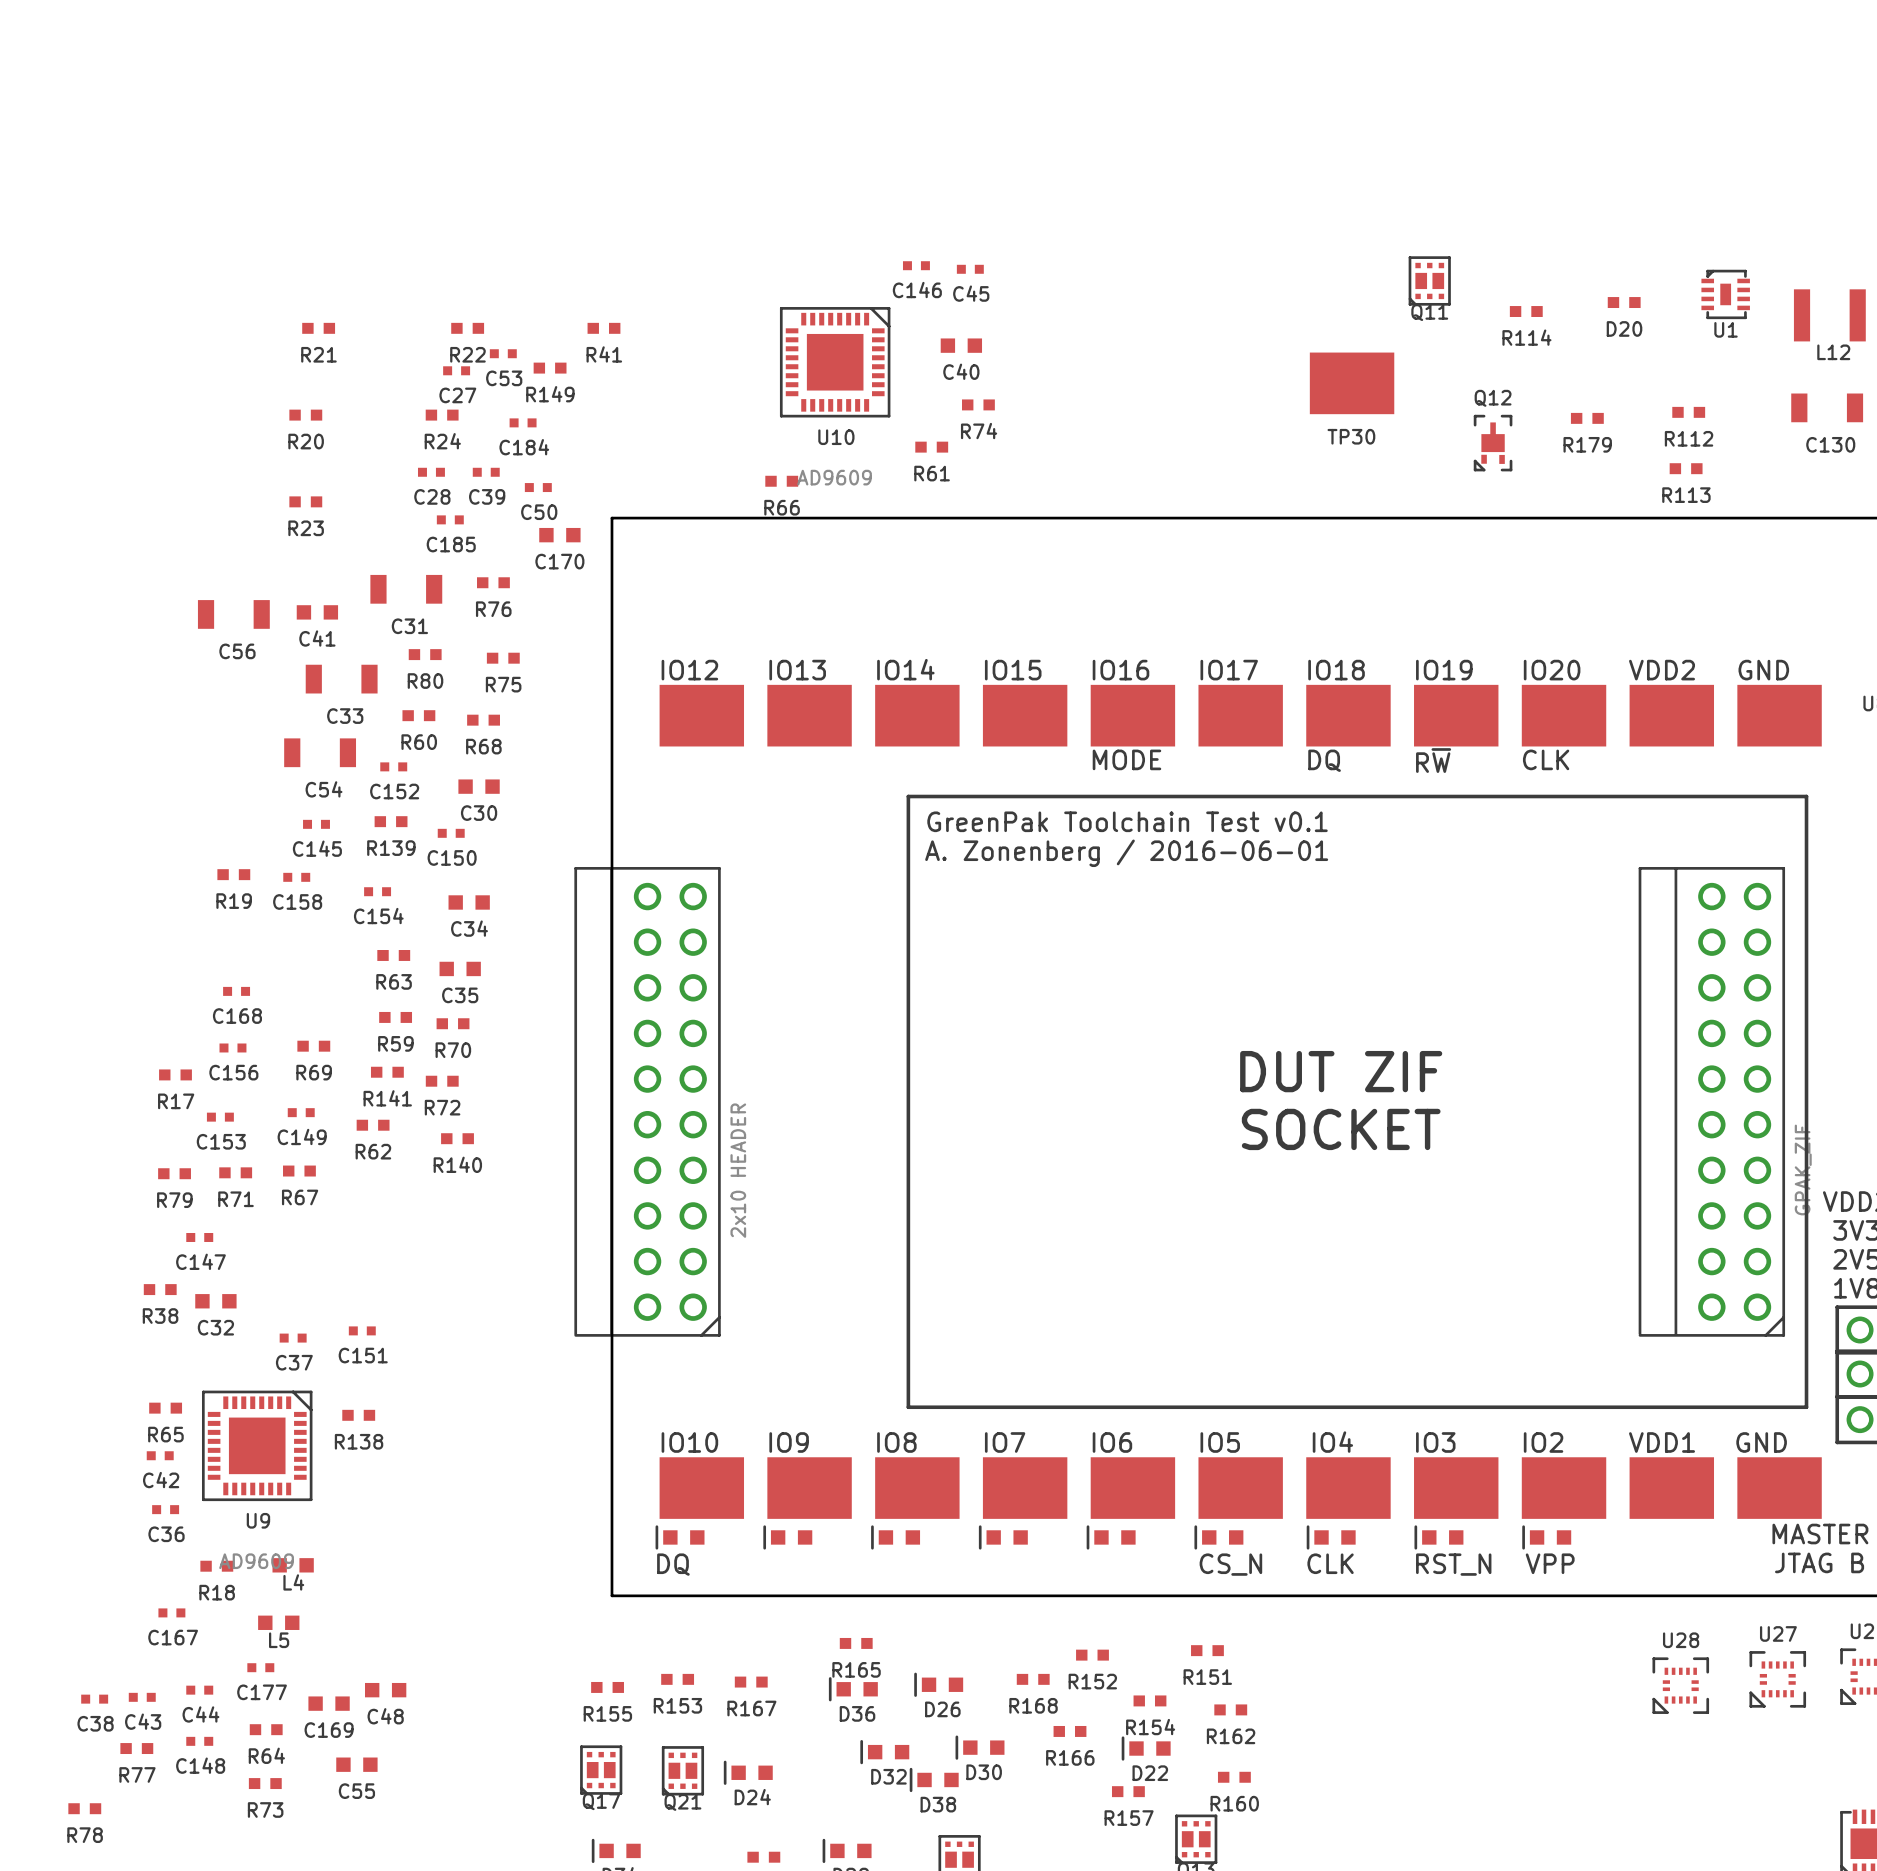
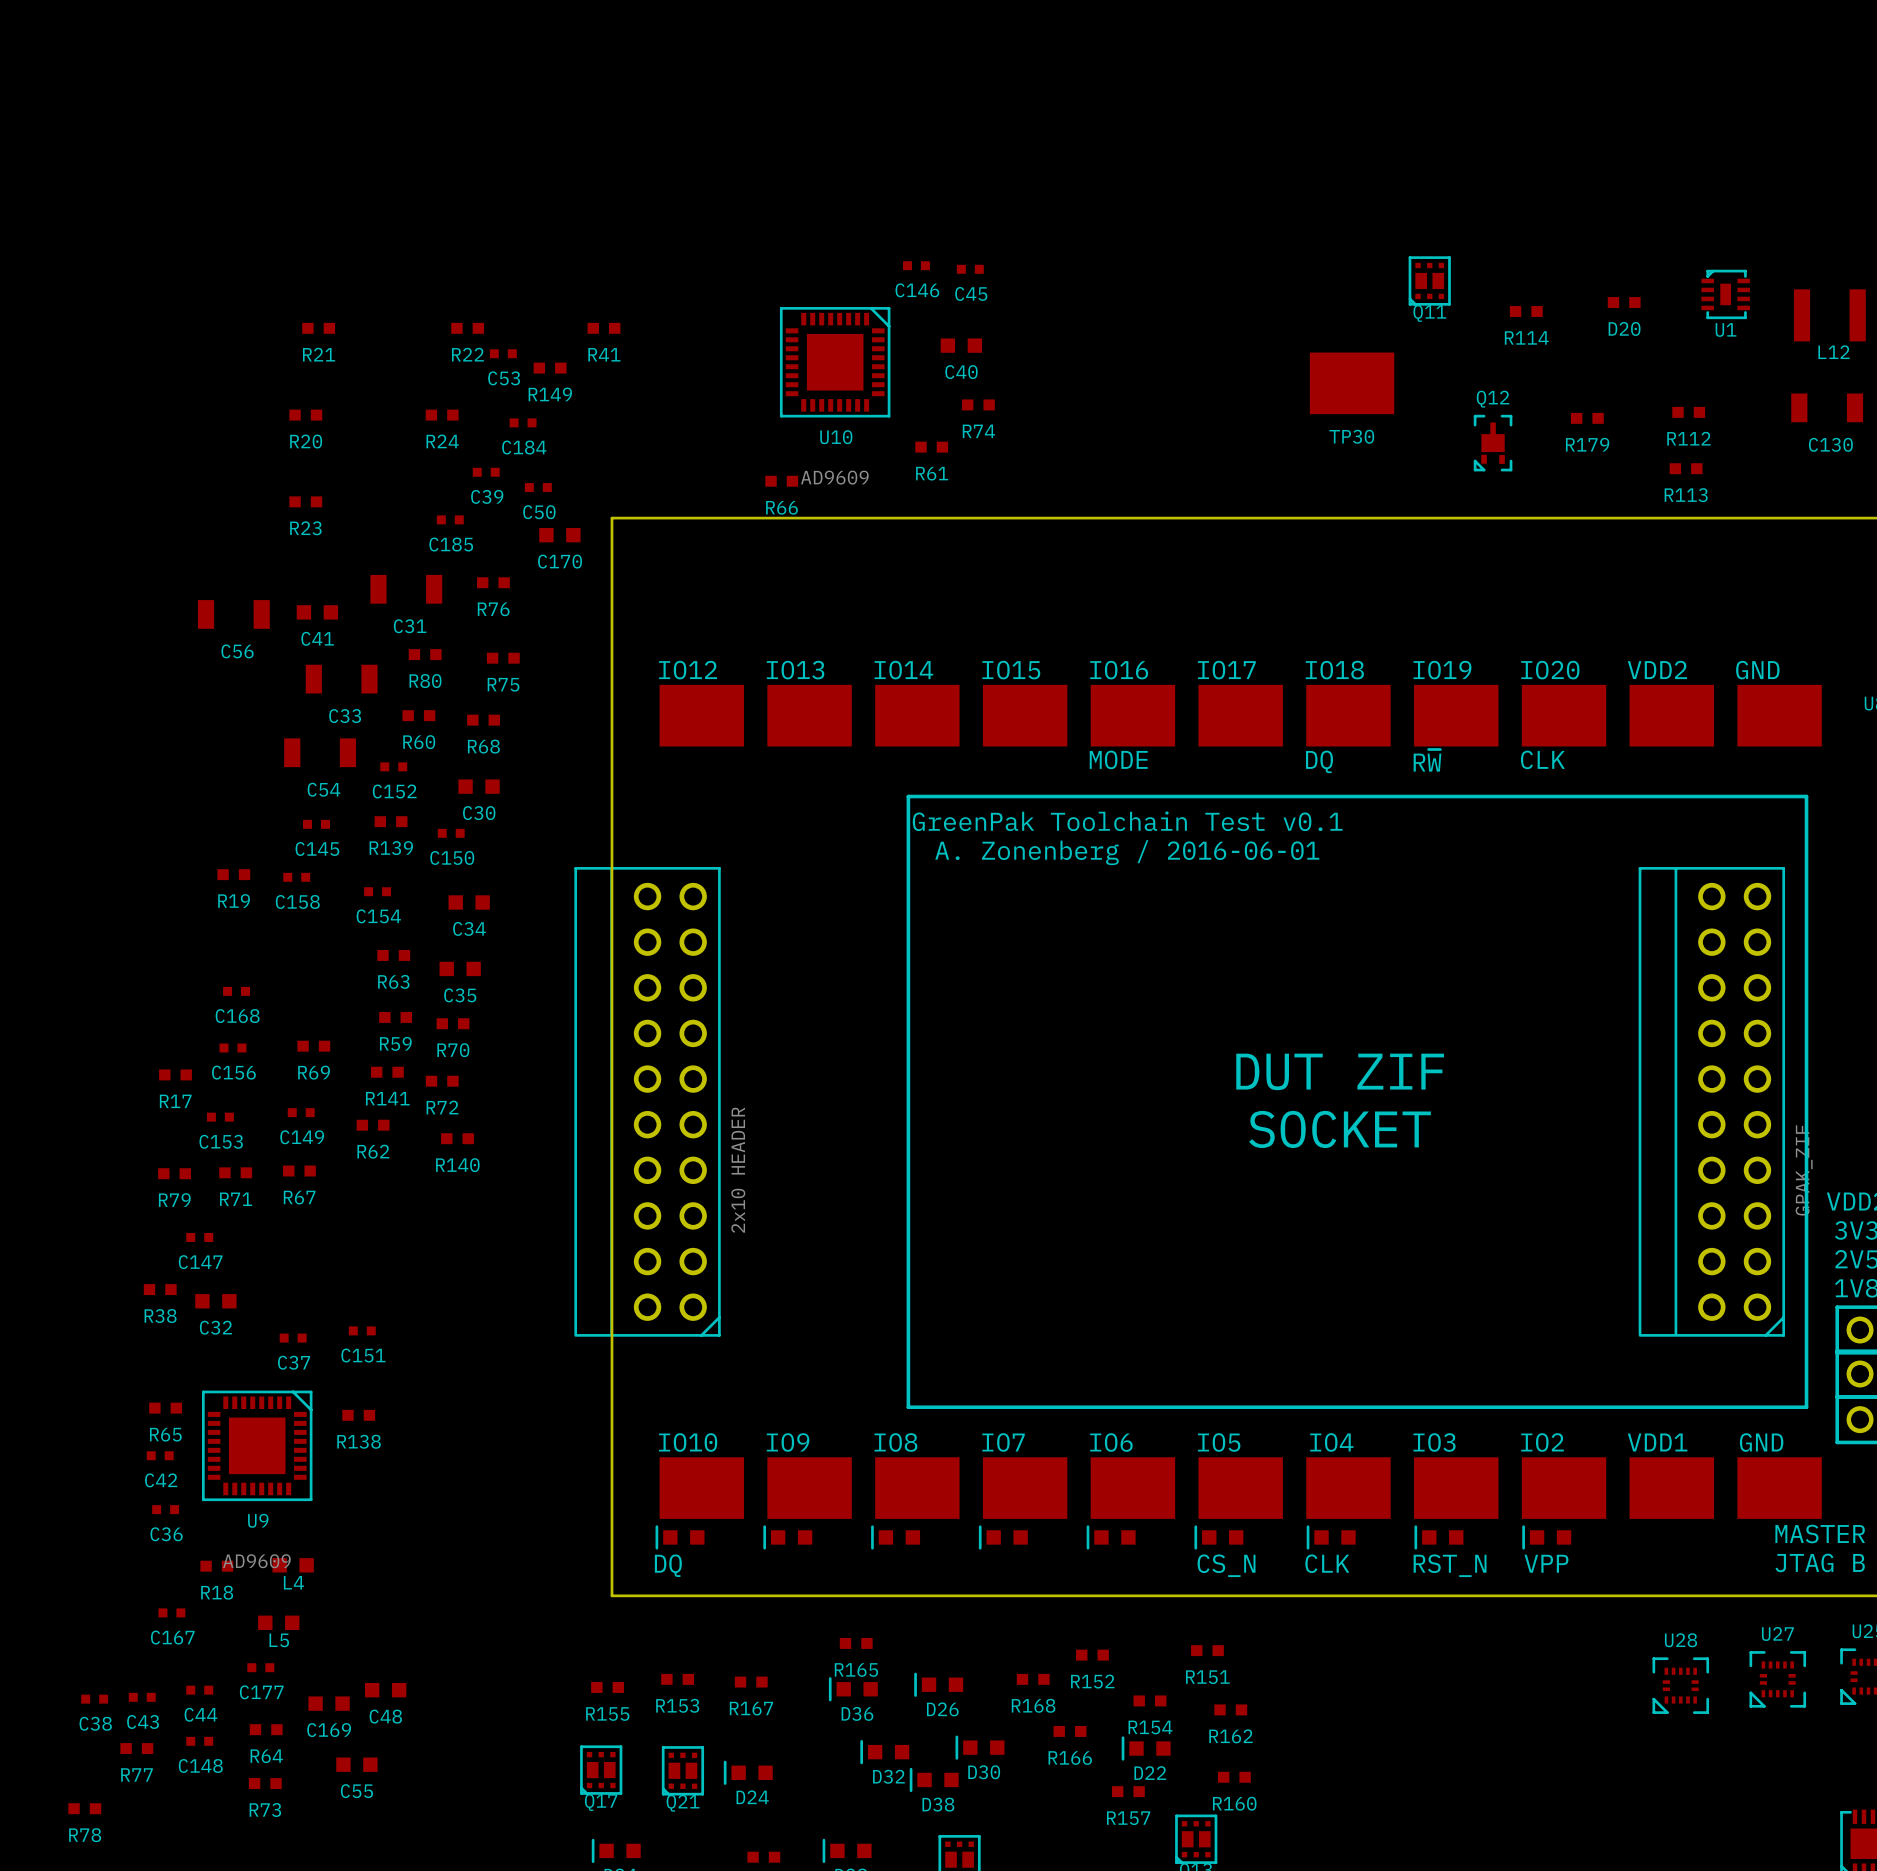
C27: (456, 370) -> none
C28: (431, 472) -> none

